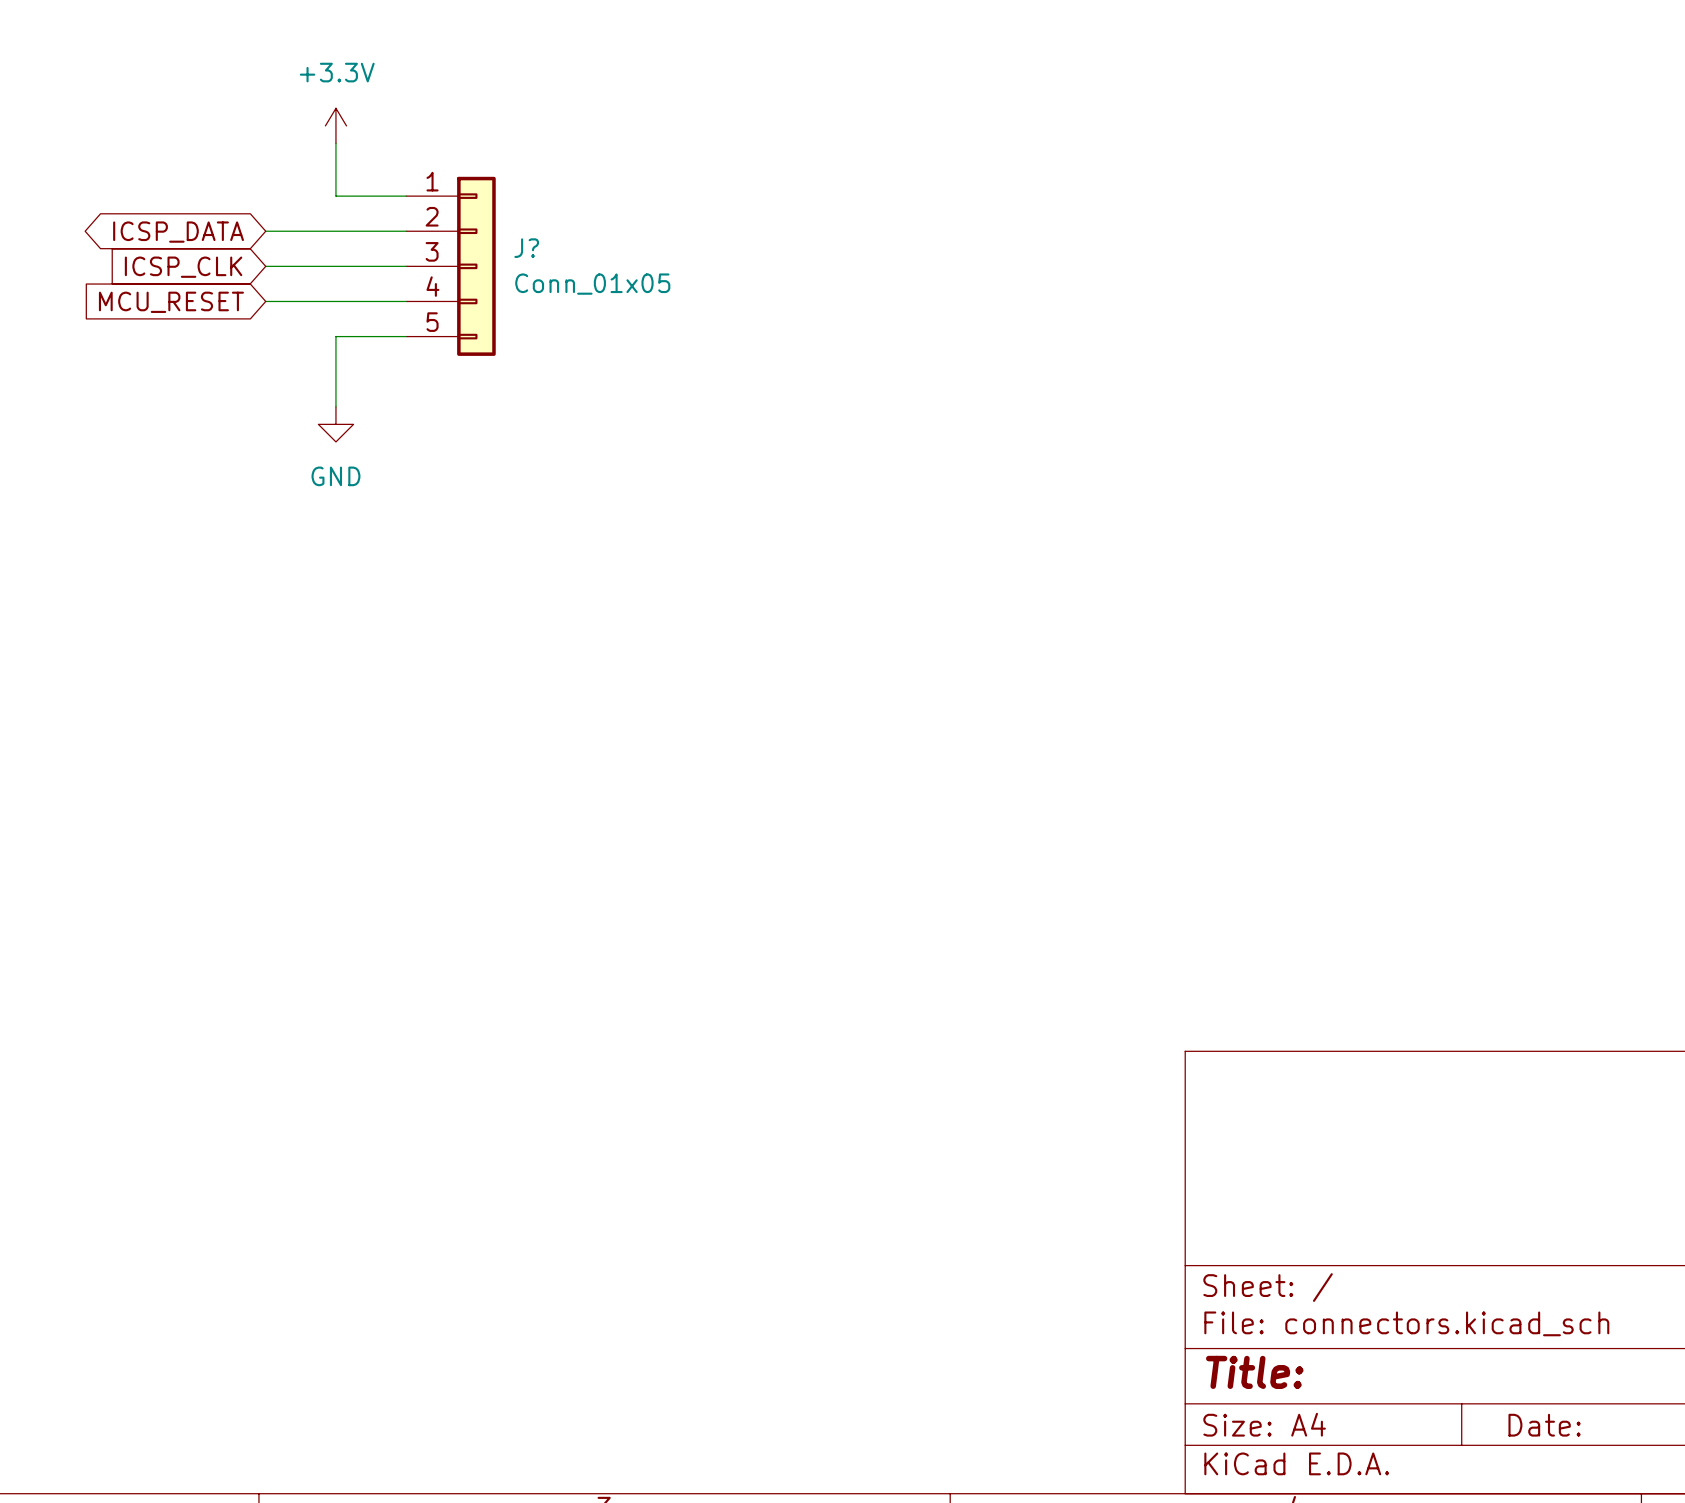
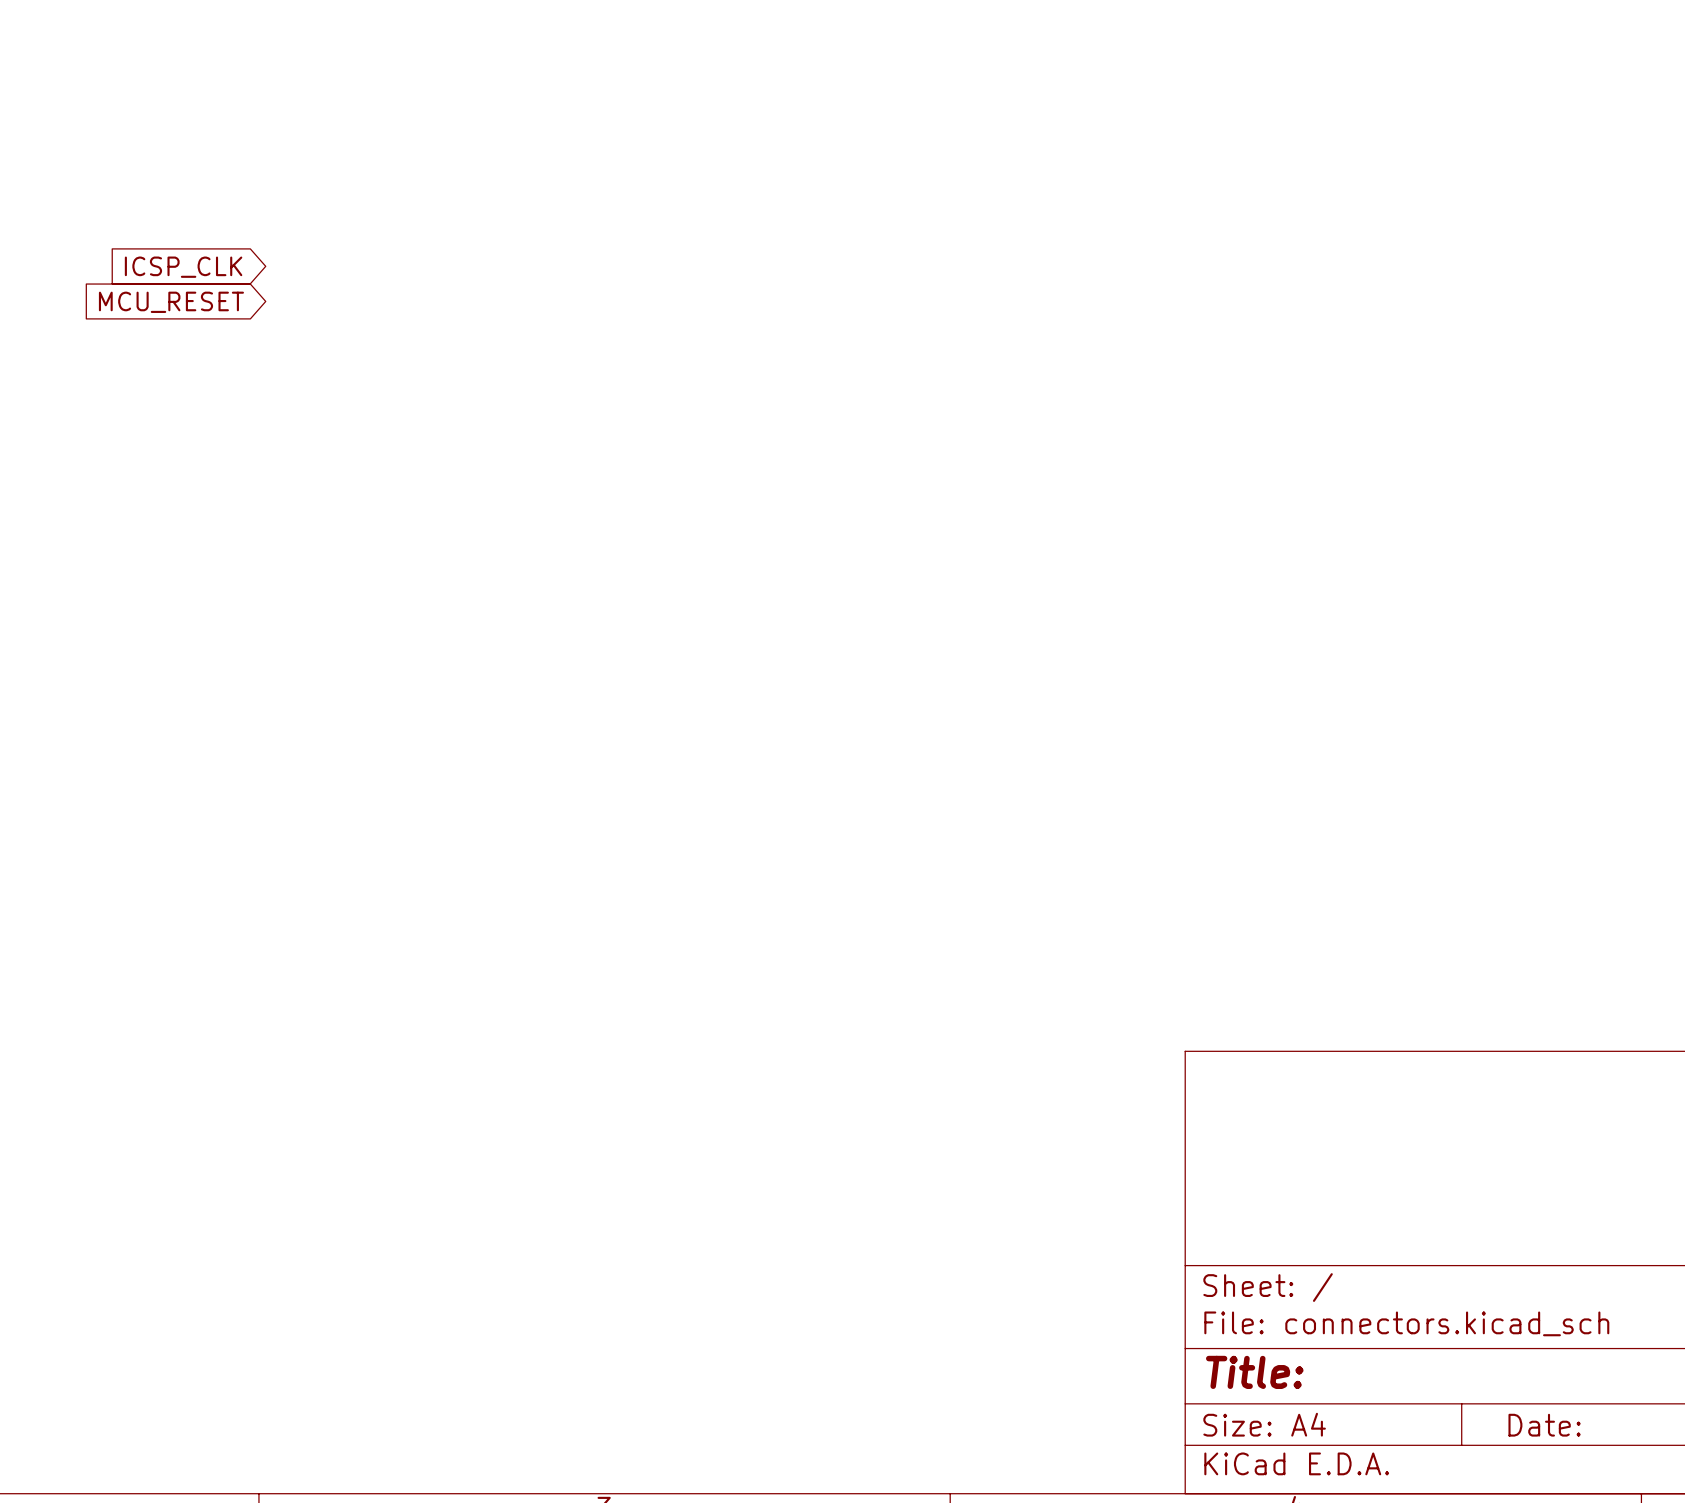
power symbol: +3.3V (335, 125) -> none
wire: (335, 143) (335, 196) (406, 196) -> none
wire: (265, 231) (406, 231) -> none
global label: ICSP_DATA (178, 232) -> none
wire: (265, 266) (406, 266) -> none
J?: Conn_01x05 (450, 266) -> none
wire: (265, 301) (406, 301) -> none
wire: (406, 336) (335, 336) (335, 406) -> none
power symbol: GND (335, 424) -> none

